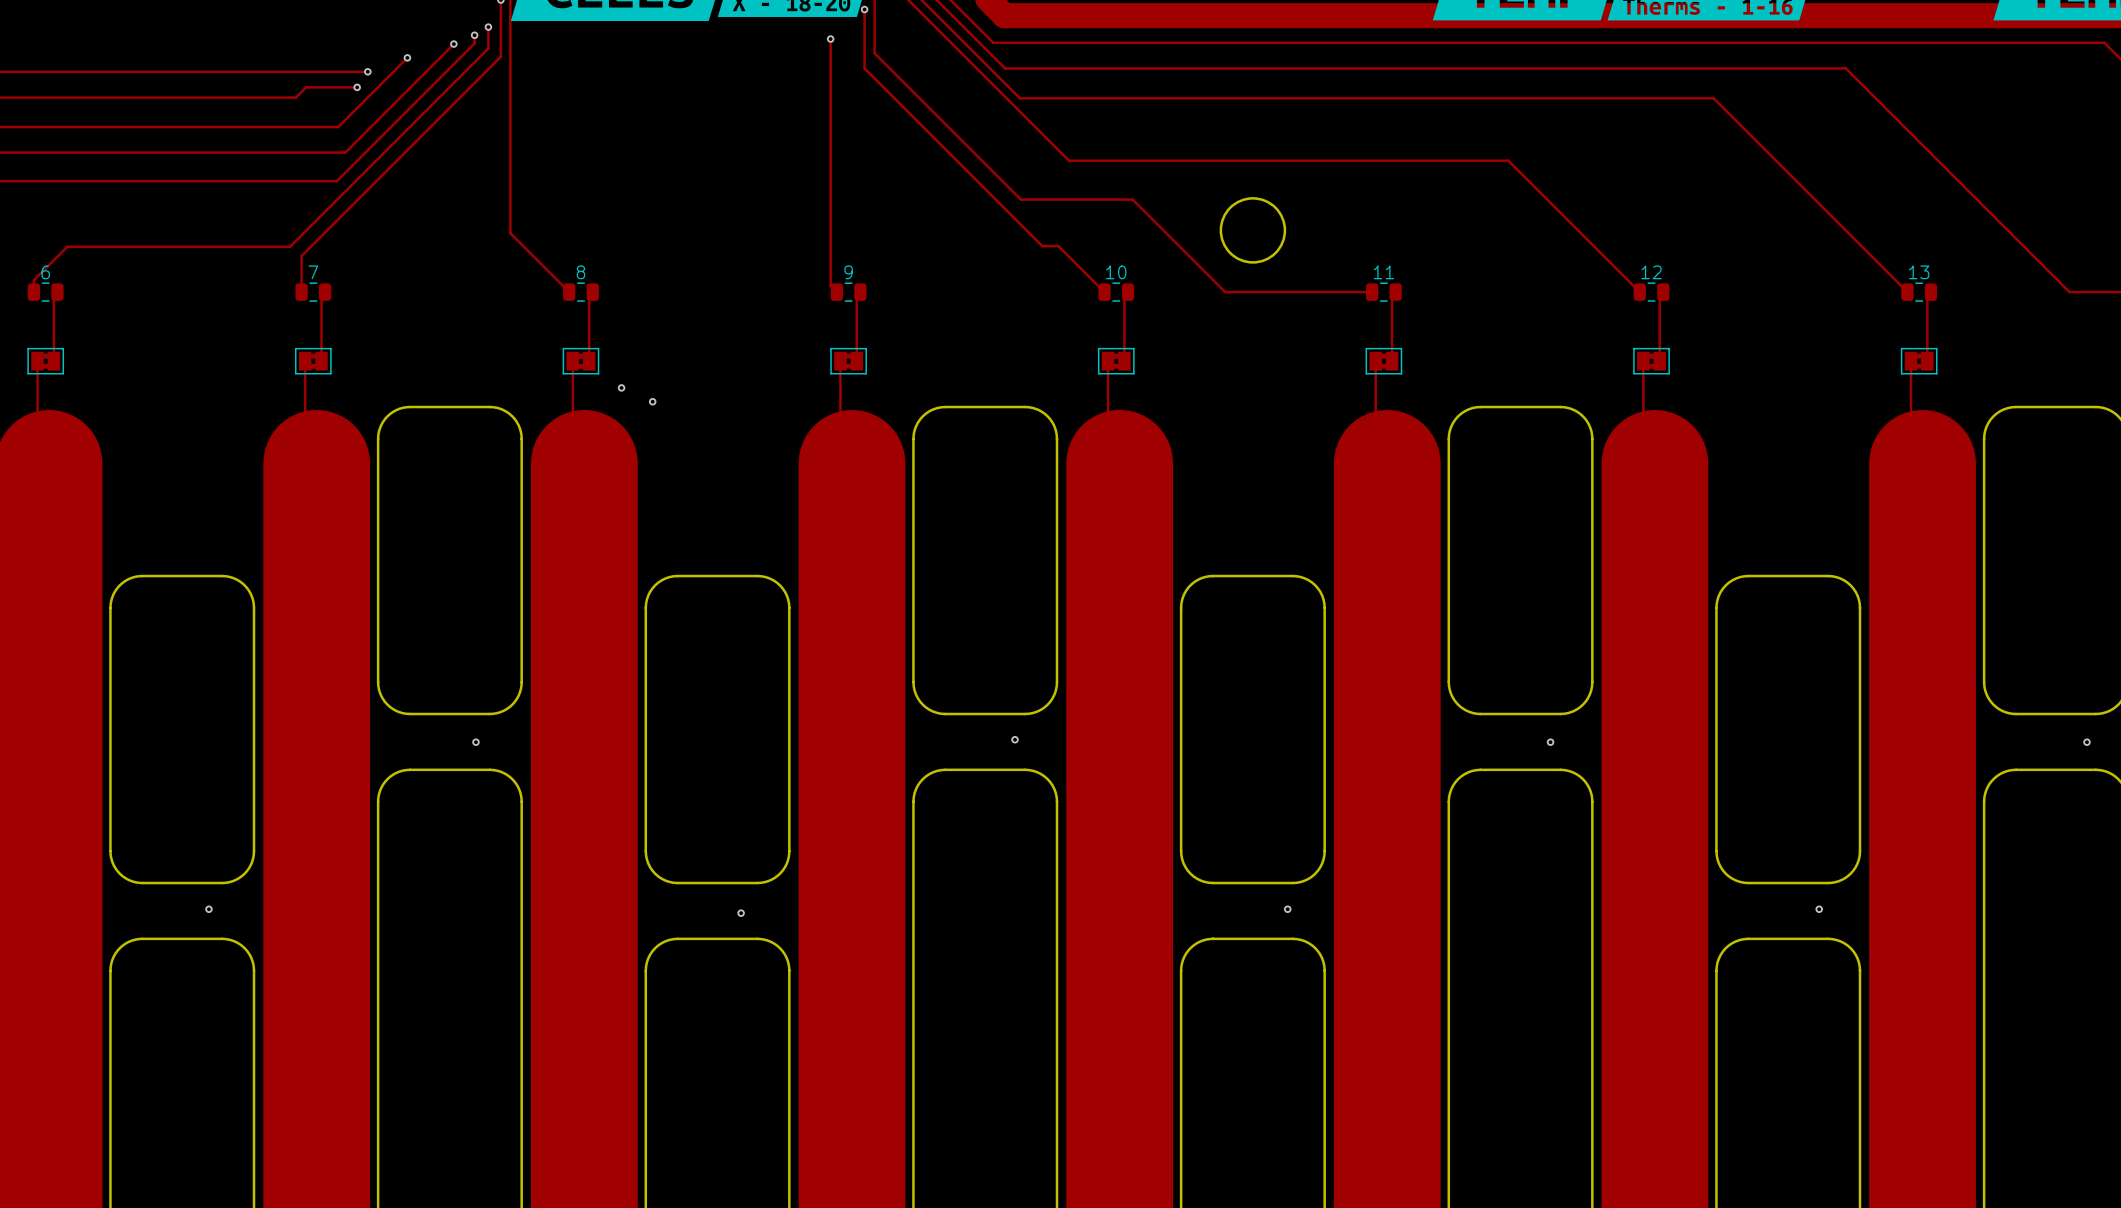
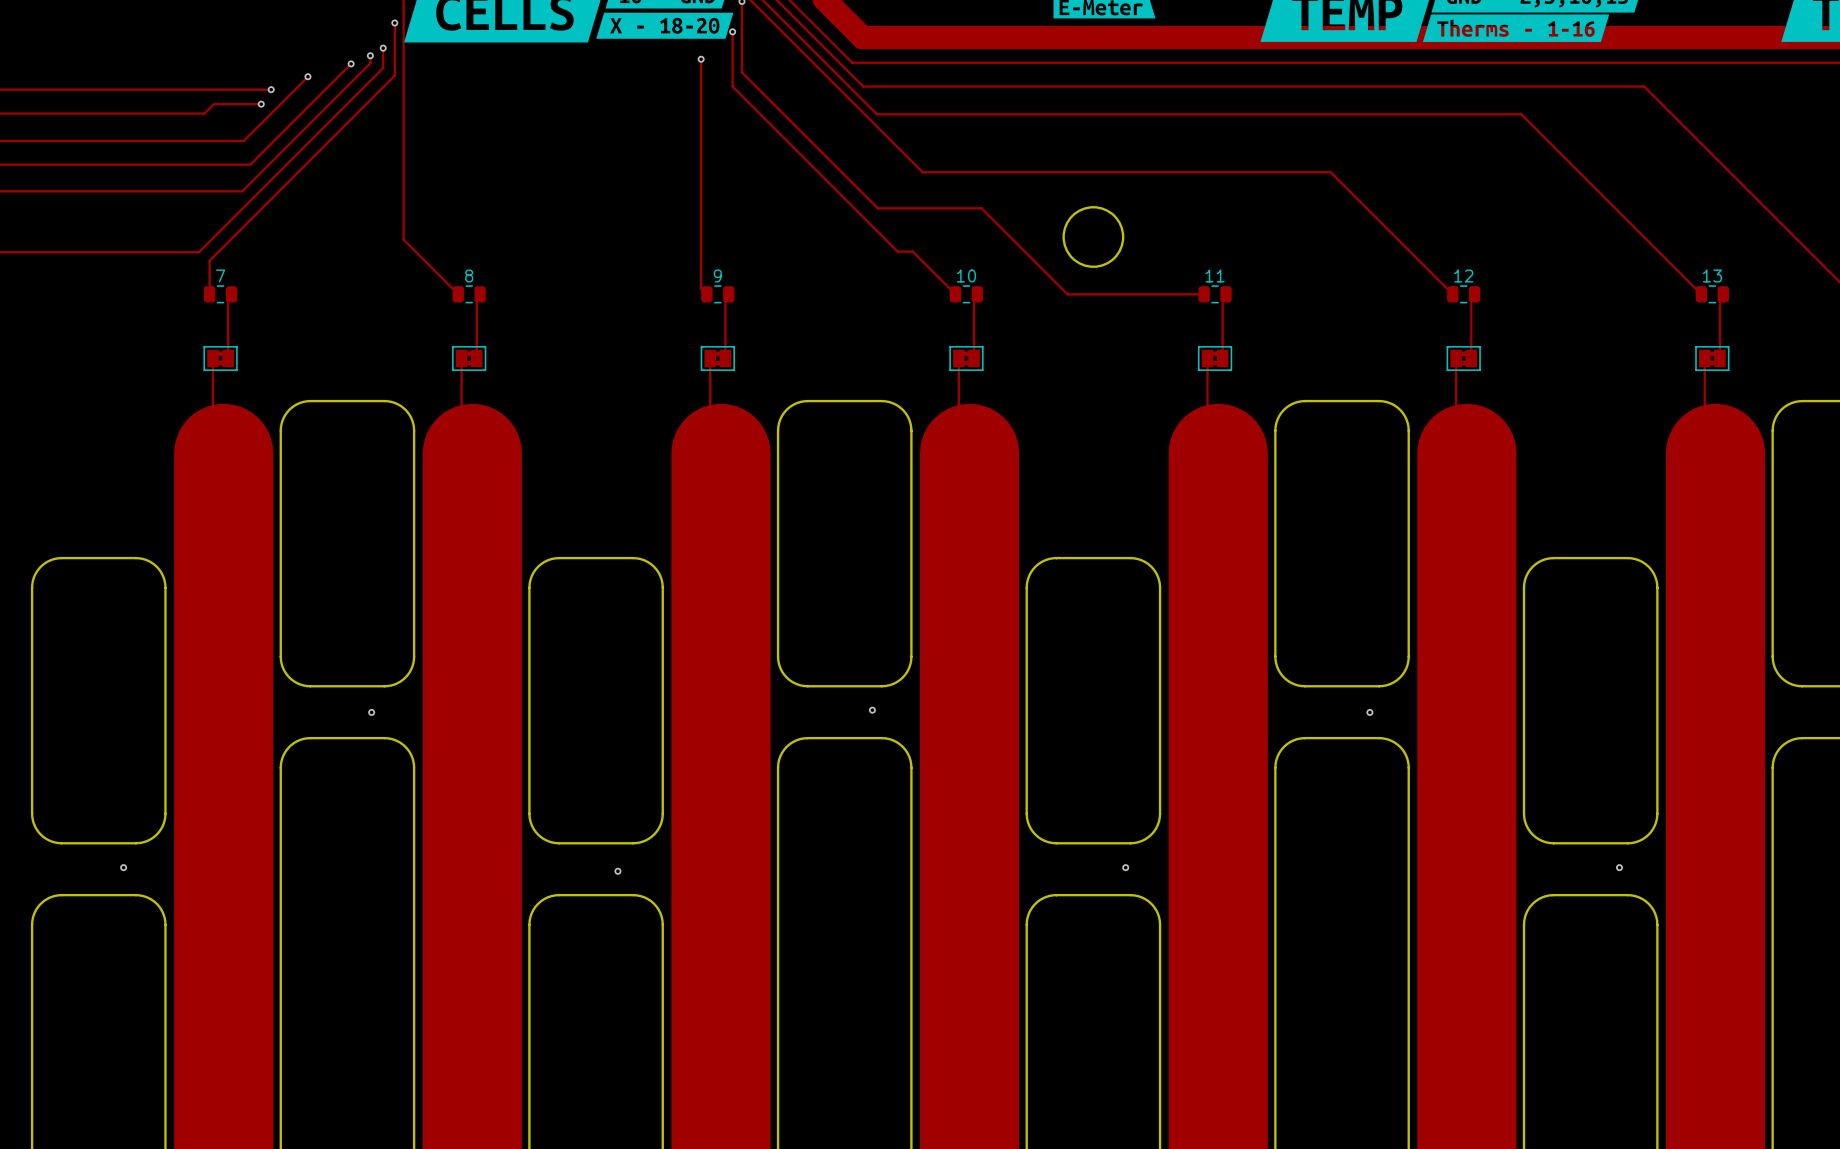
via: (621, 387) -> none
via: (652, 401) -> none

